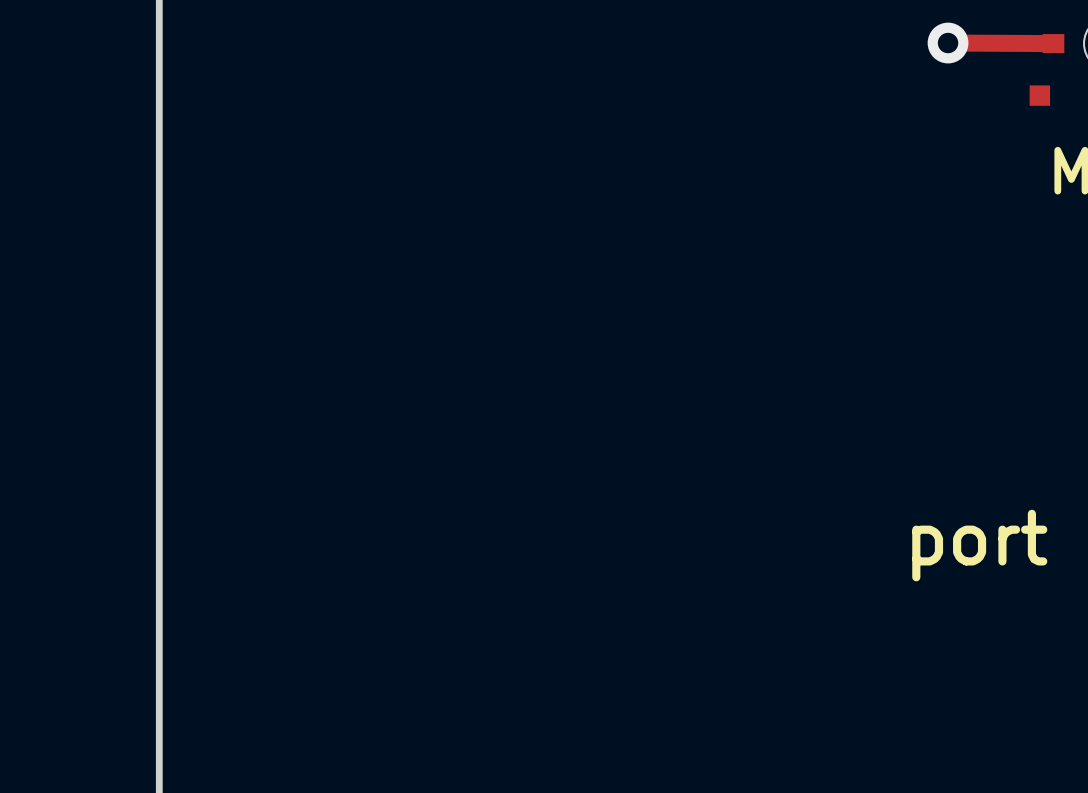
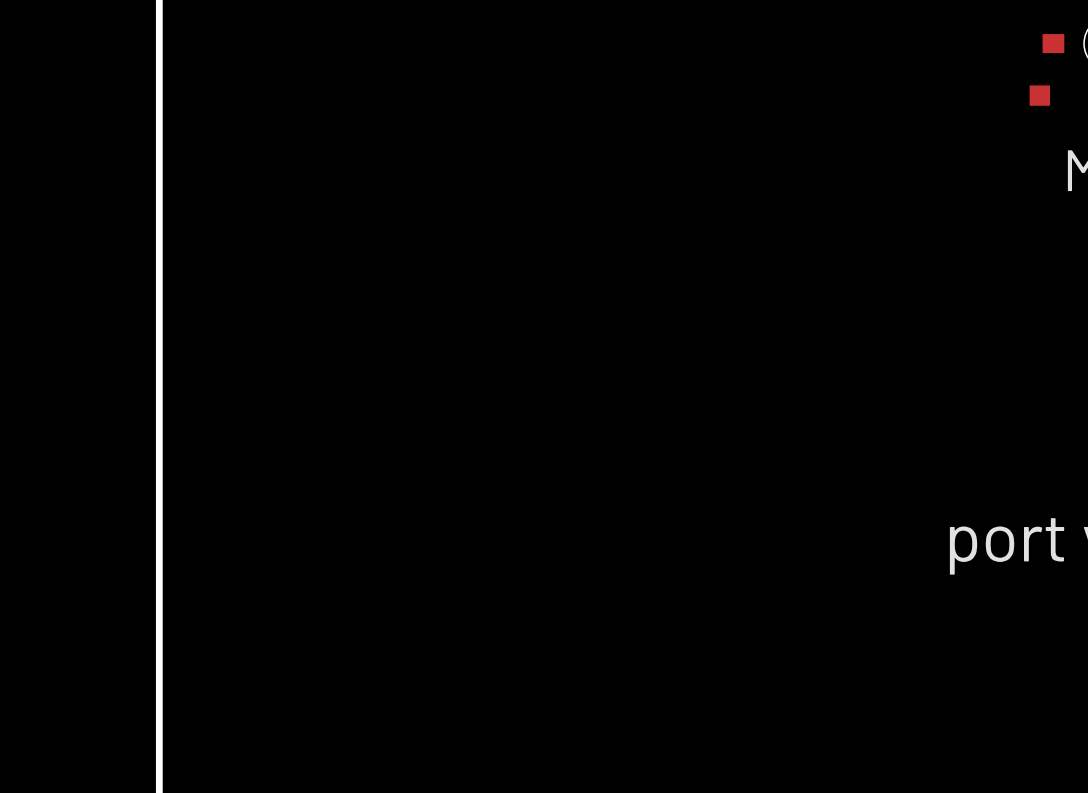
track: (948, 43) (1053, 43) -> none
via: (948, 43) -> none

